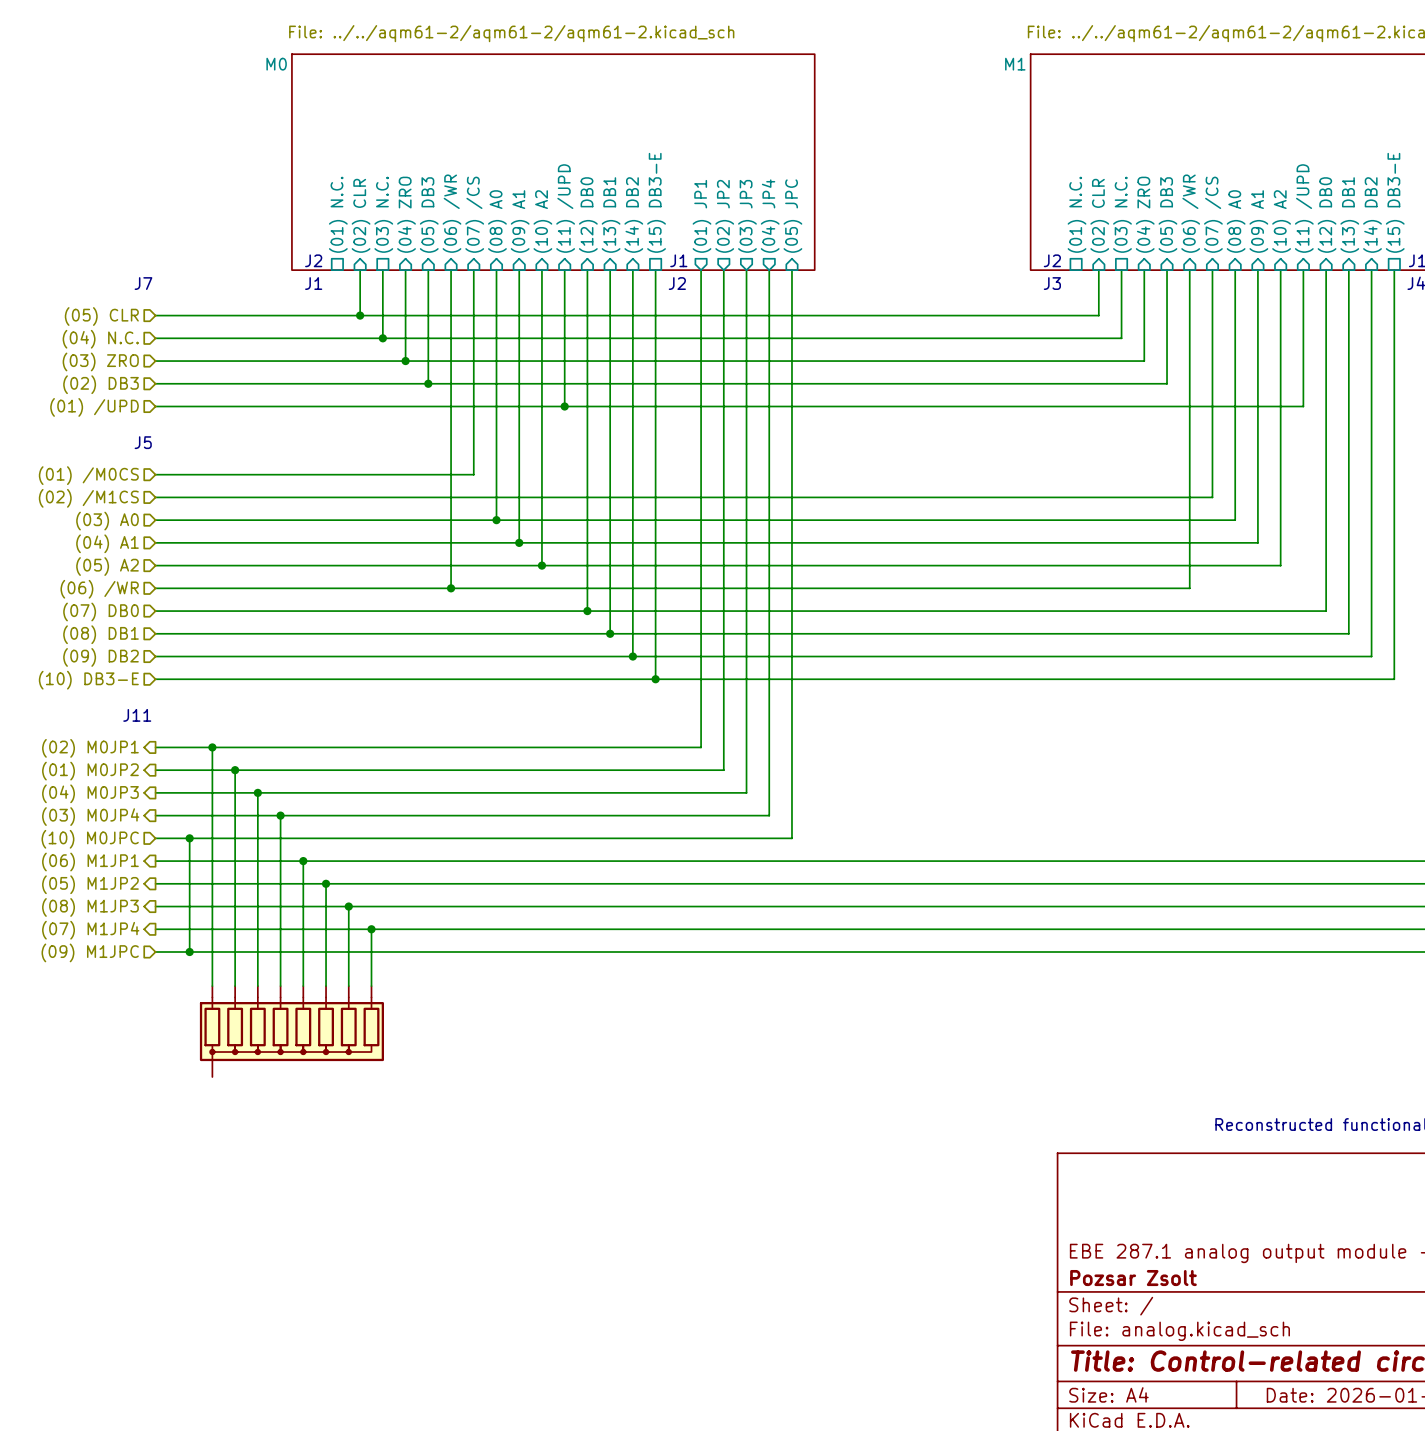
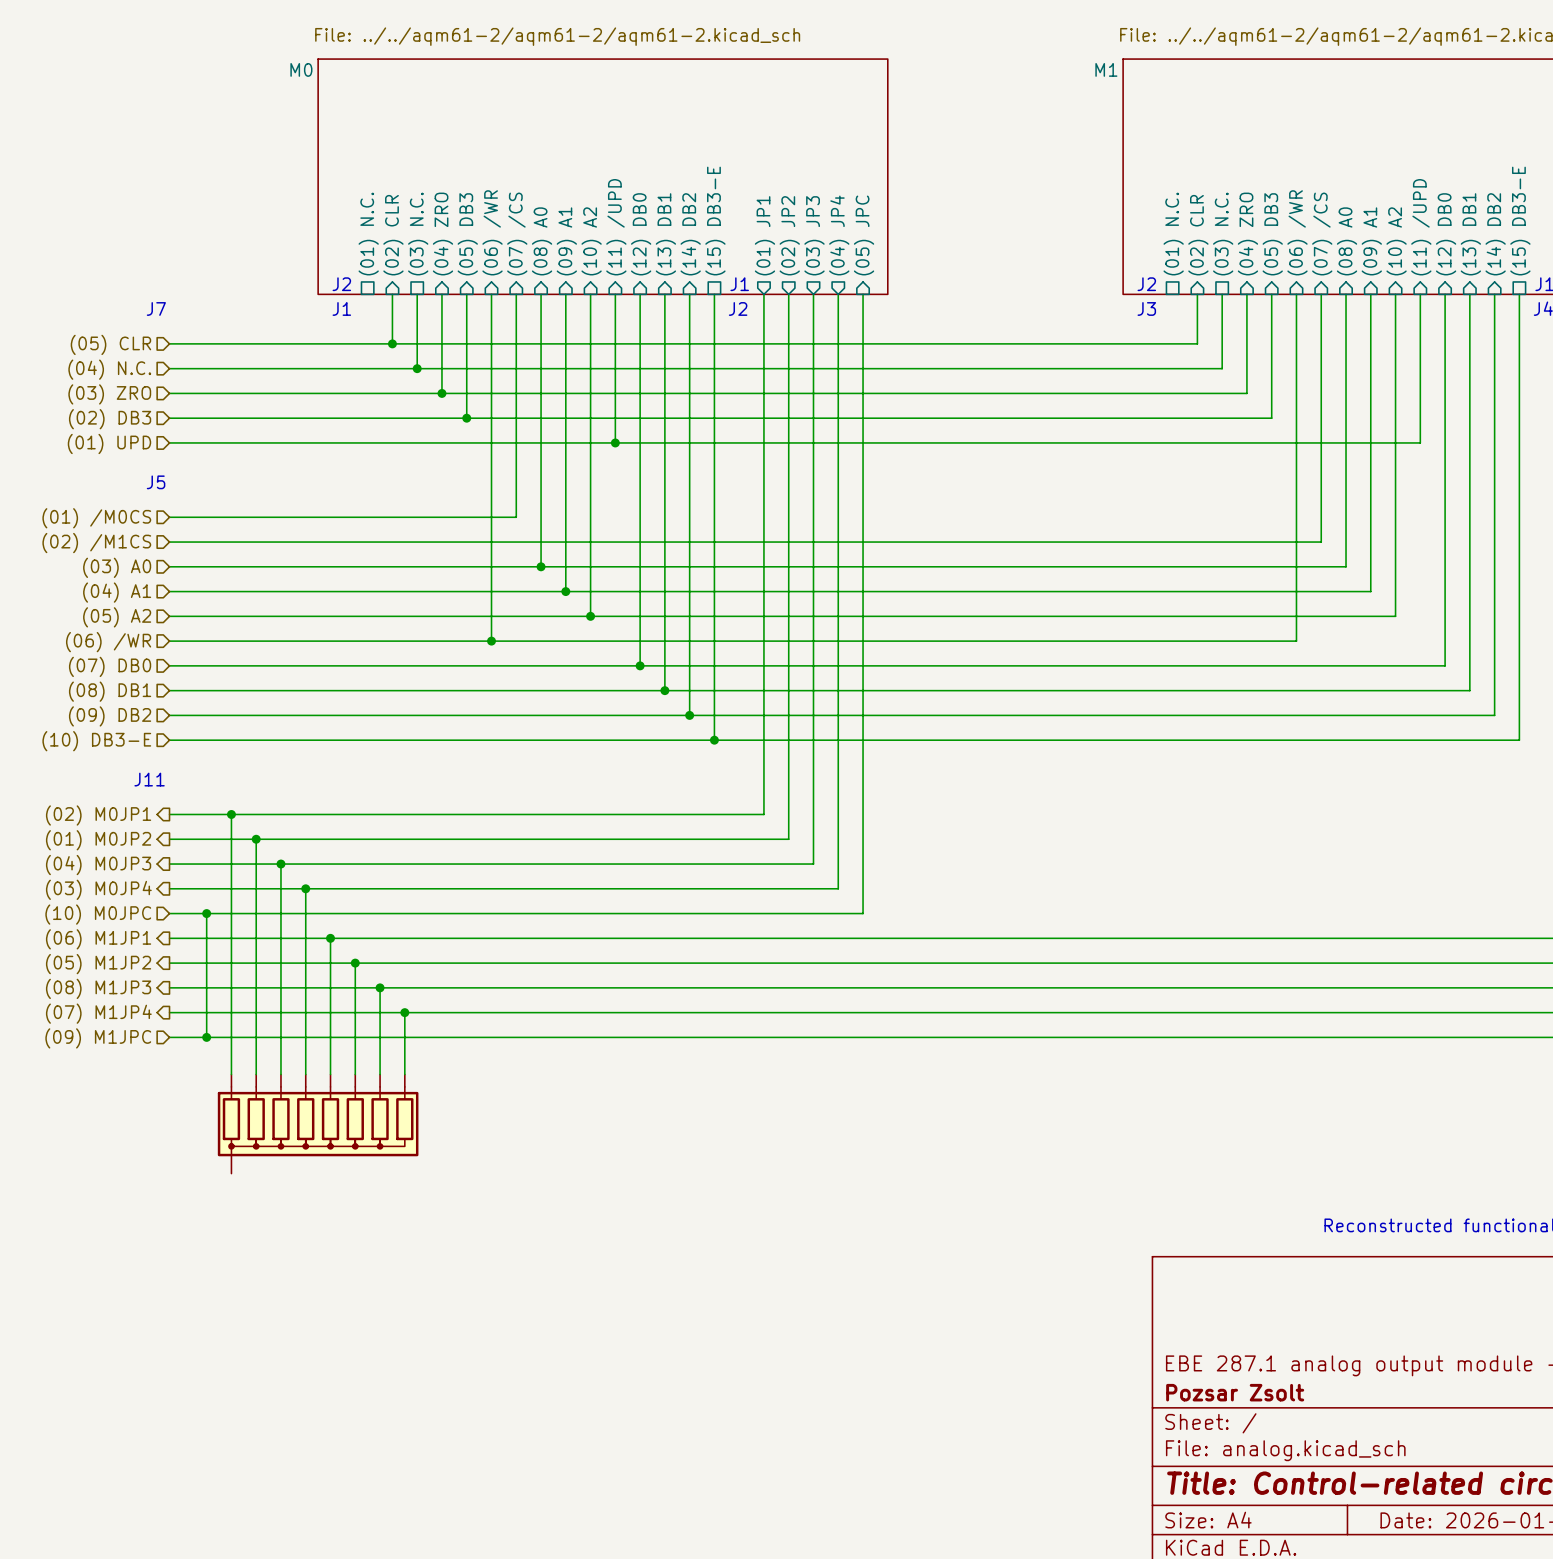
hierarchical label: (01) /UPD (94, 407) -> (01) UPD (109, 443)

